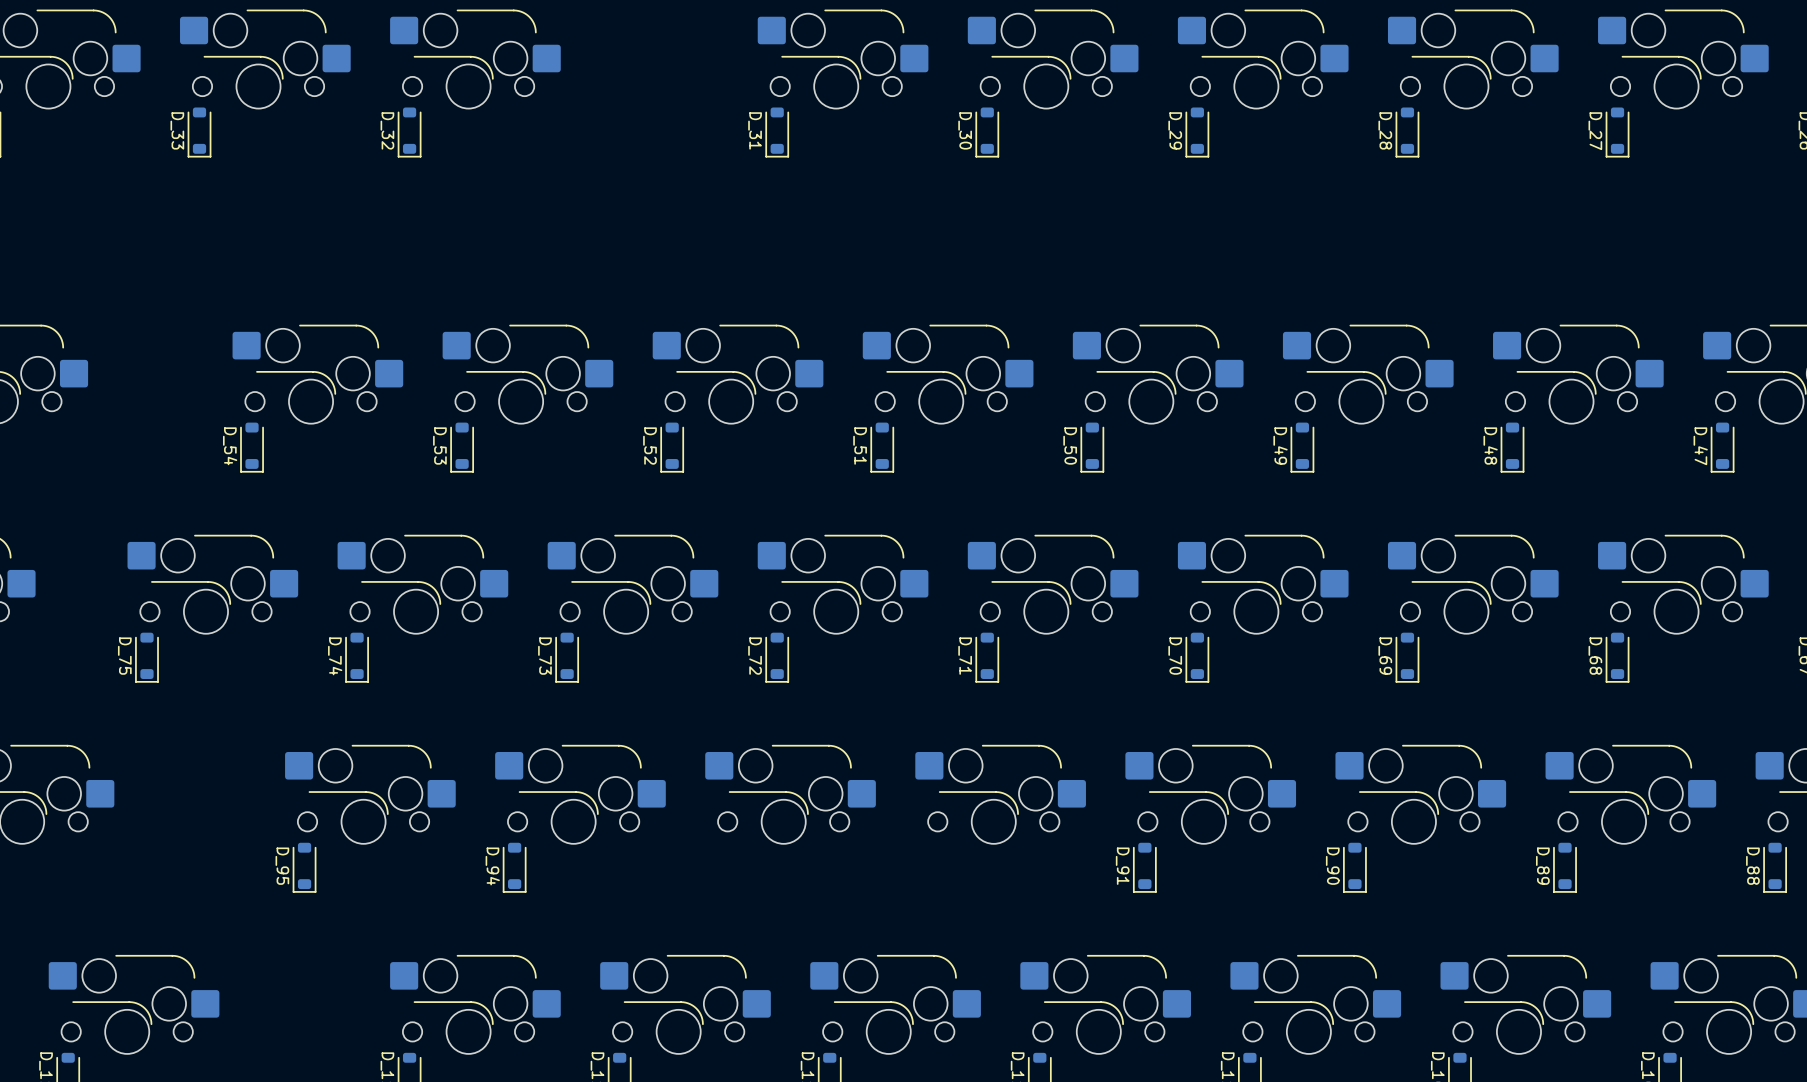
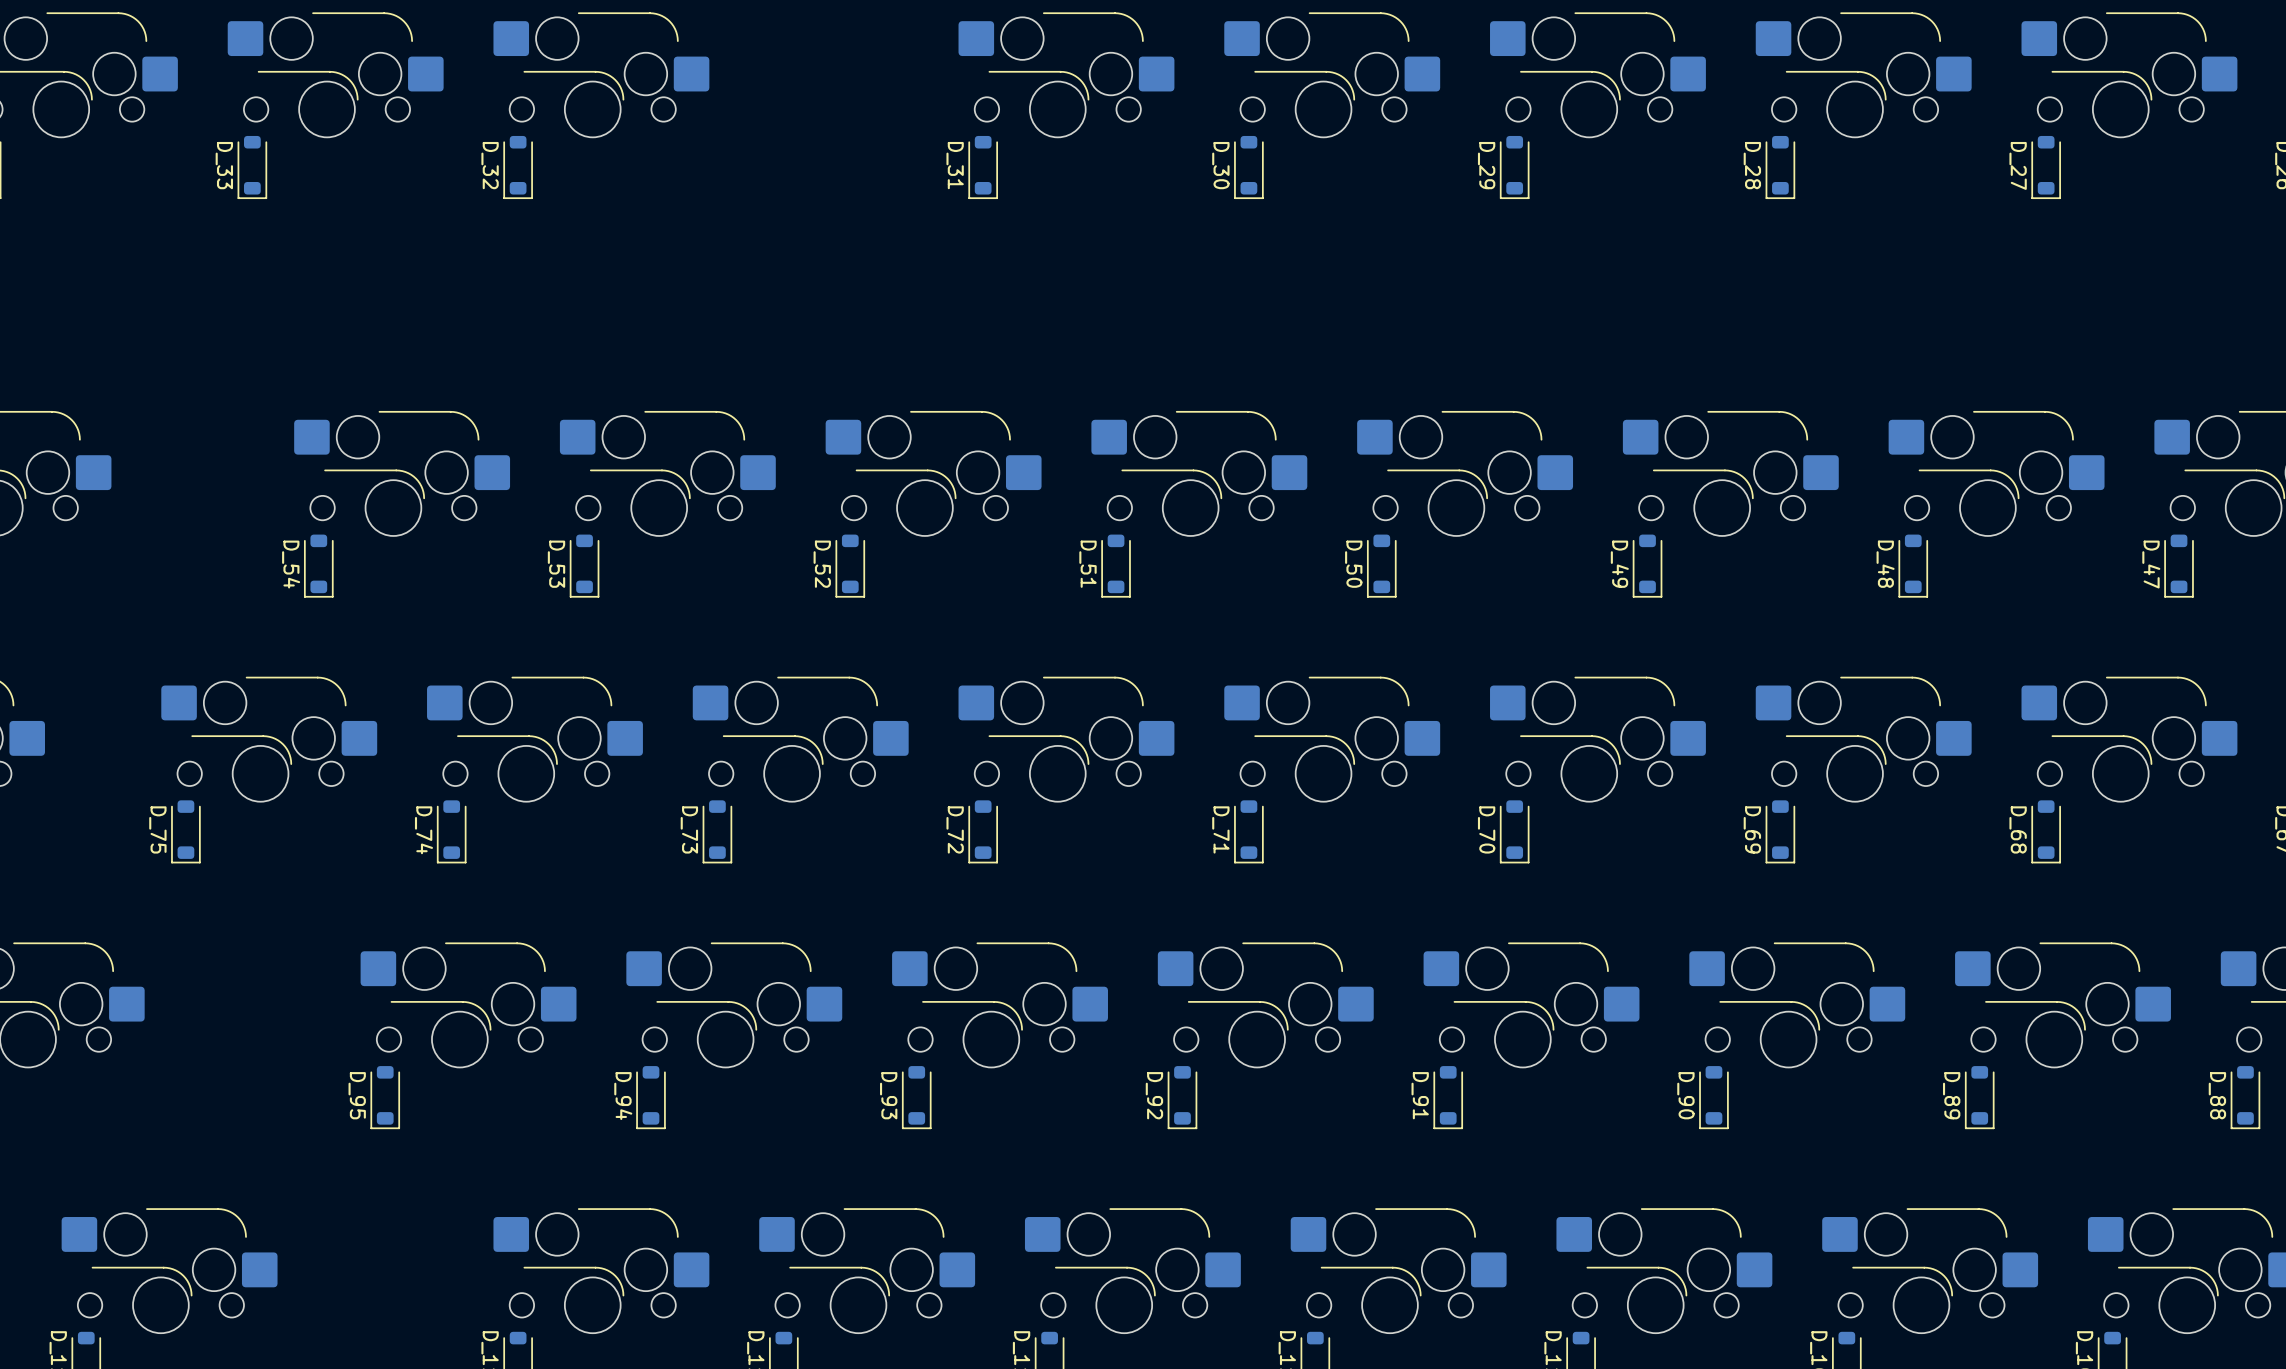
D_93: none -> (916, 1097)
D_92: none -> (1182, 1097)

